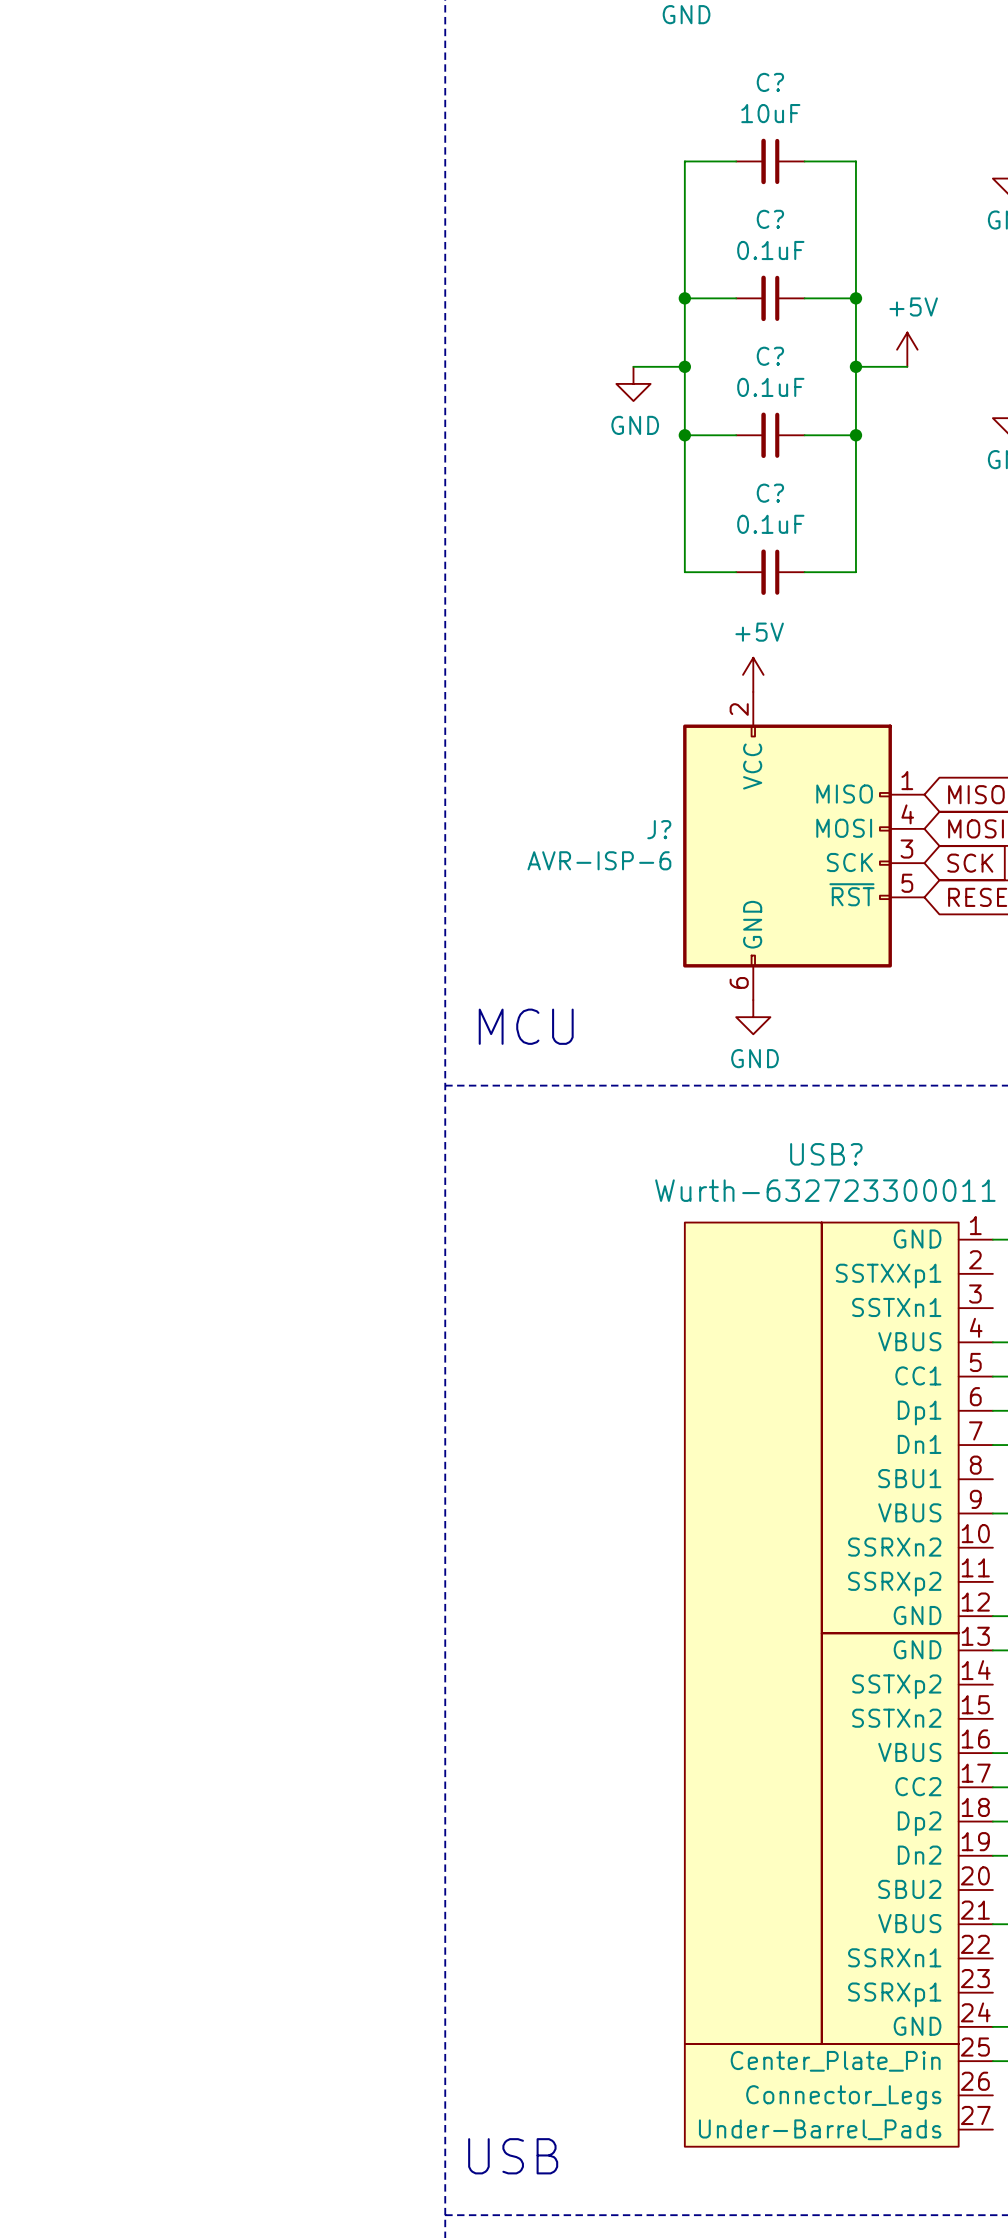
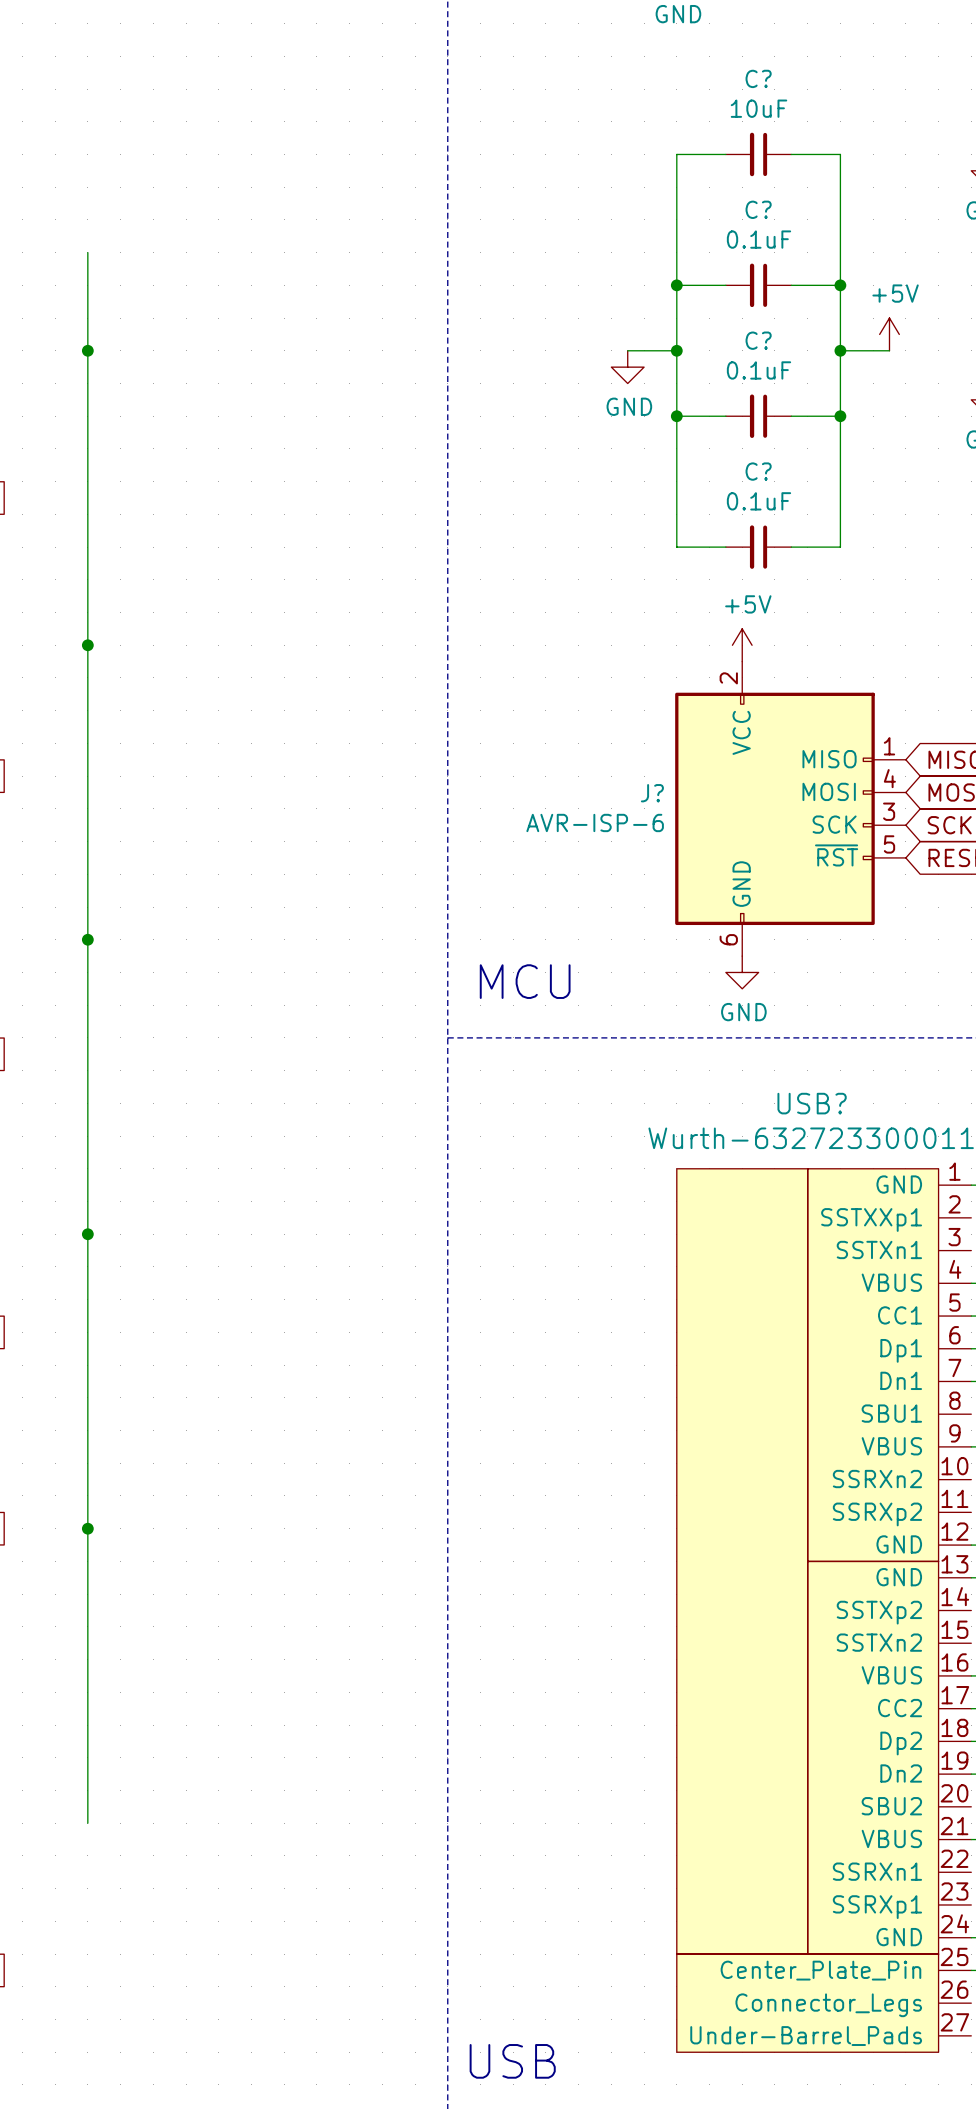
wire: none -> (87, 252) (87, 1823)
junction: none -> (87, 350)
junction: none -> (87, 645)
junction: none -> (87, 939)
junction: none -> (87, 1234)
junction: none -> (87, 1528)

